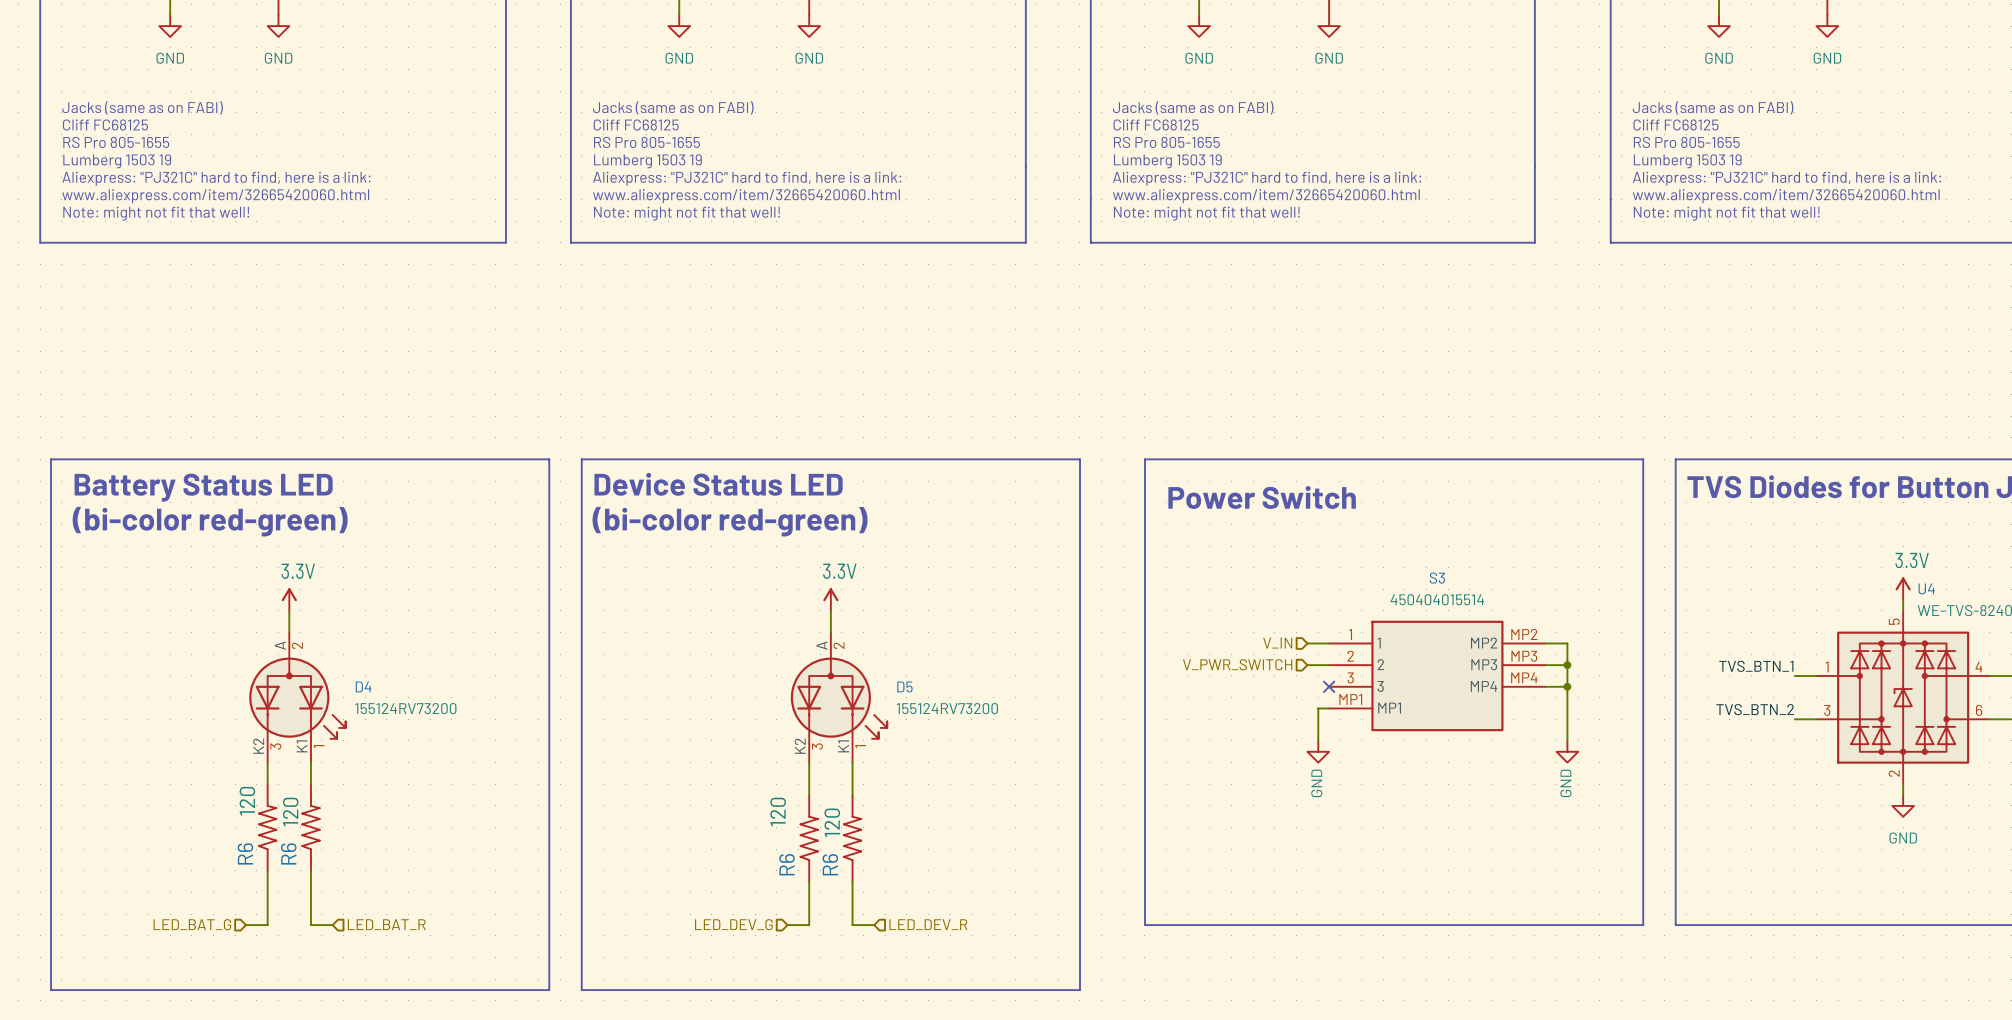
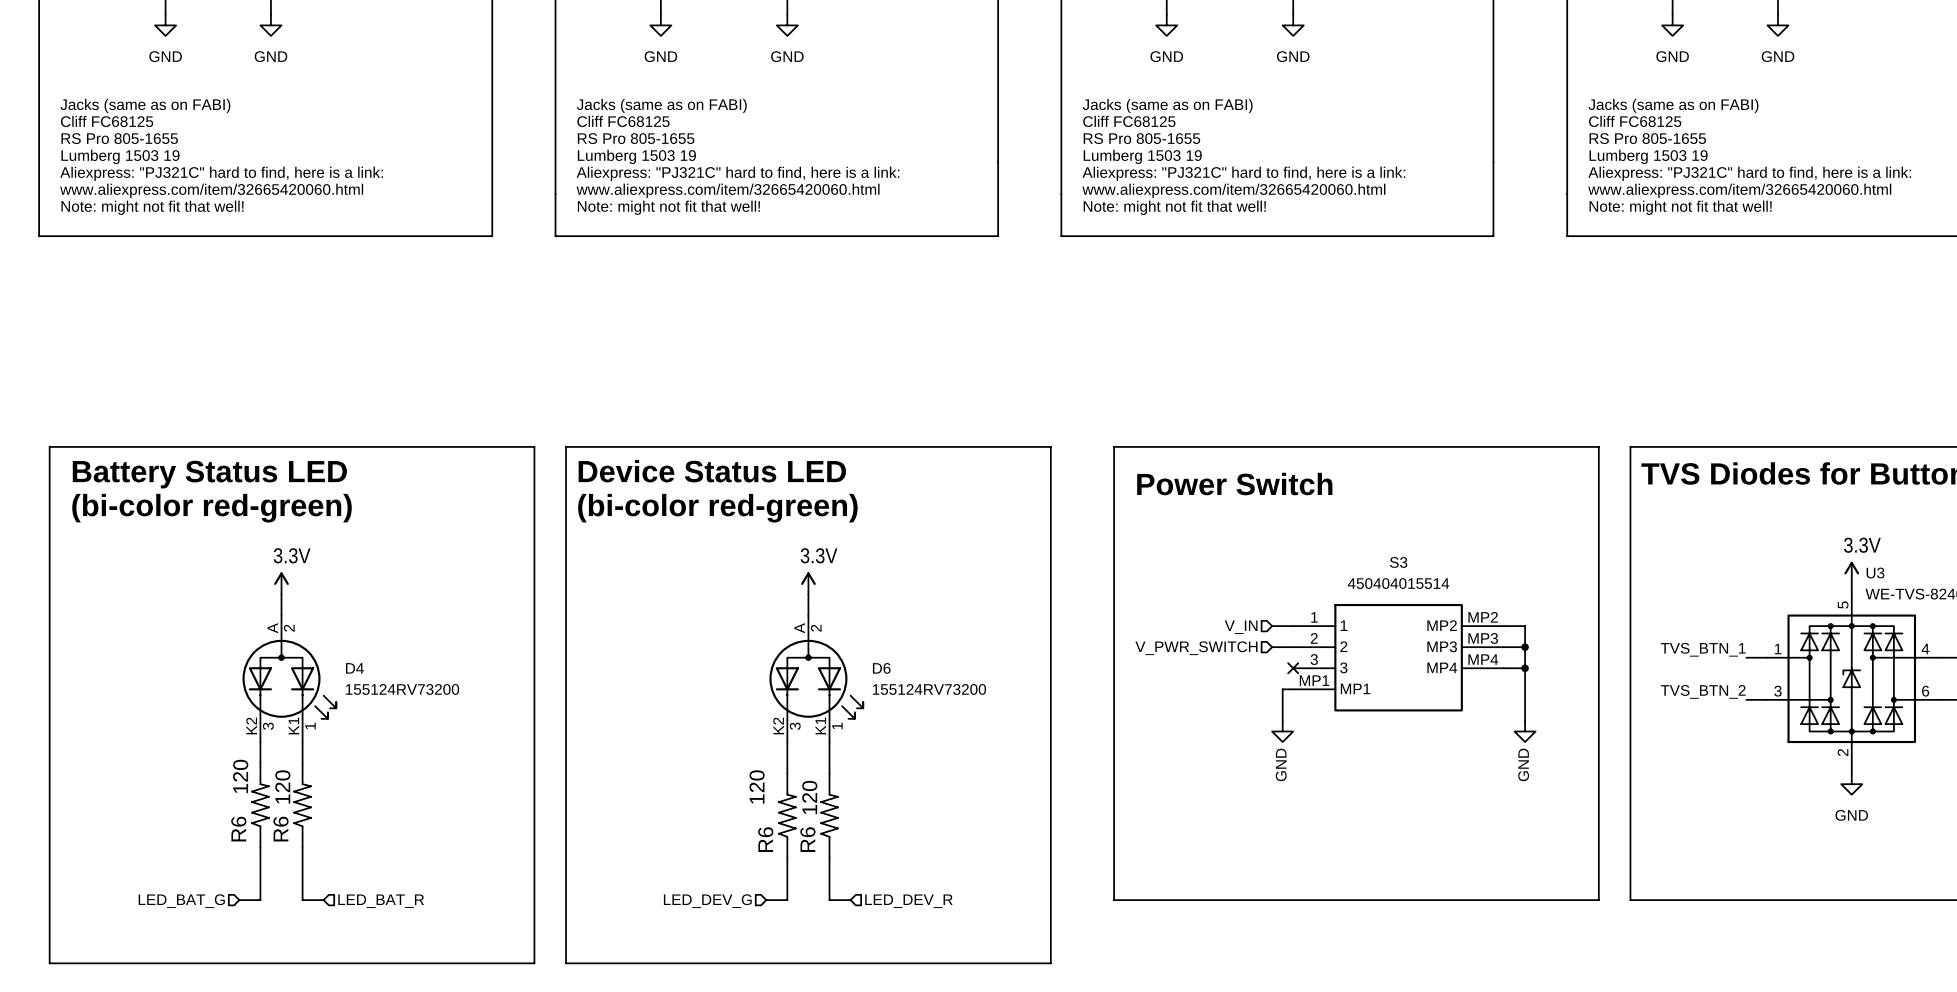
U4 name: U4 (1926, 588) -> U3 (1875, 573)
D5 name: D5 (904, 687) -> D6 (881, 668)

